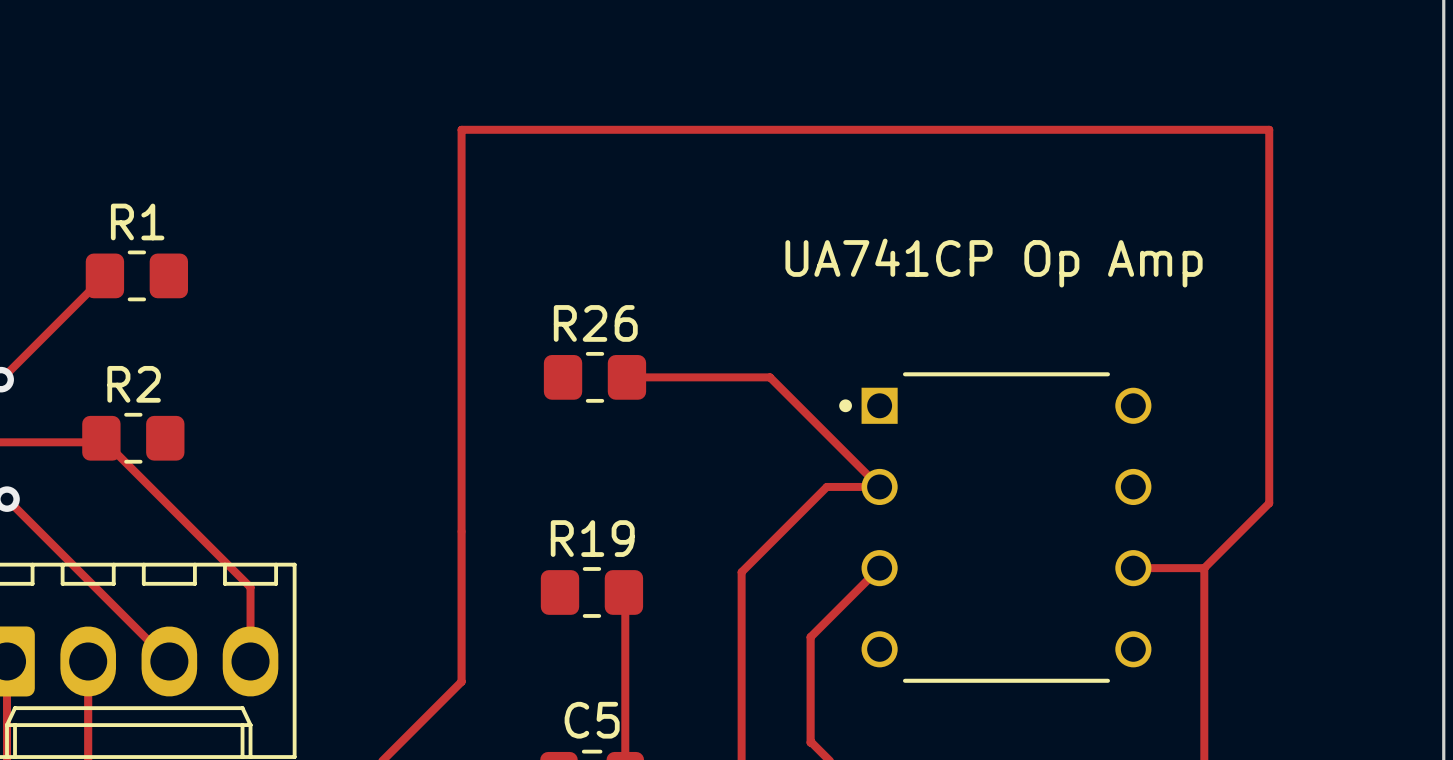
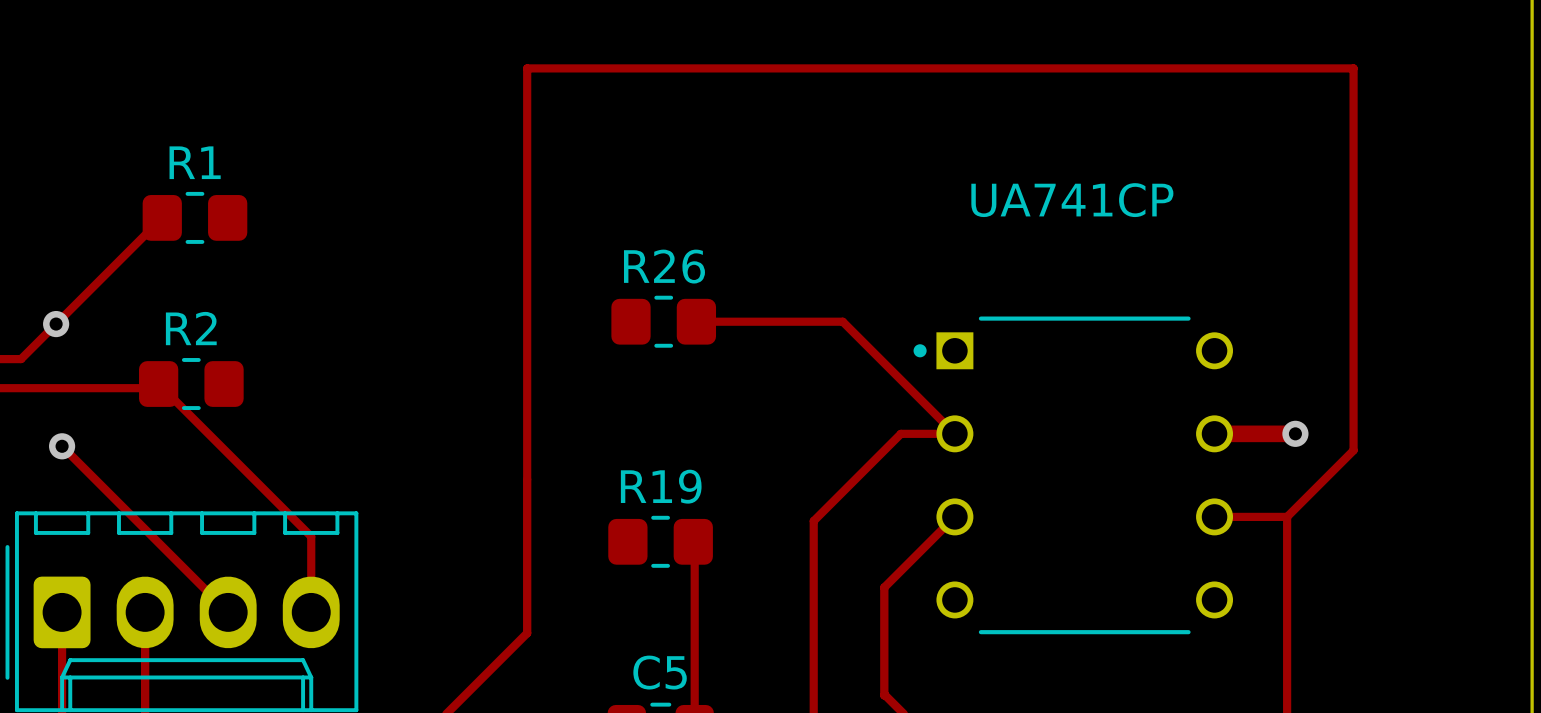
part value: UA741CP Op Amp (994, 263) -> UA741CP (1072, 200)
track: none -> (1214, 433) (1295, 433)
via: none -> (1295, 433)

